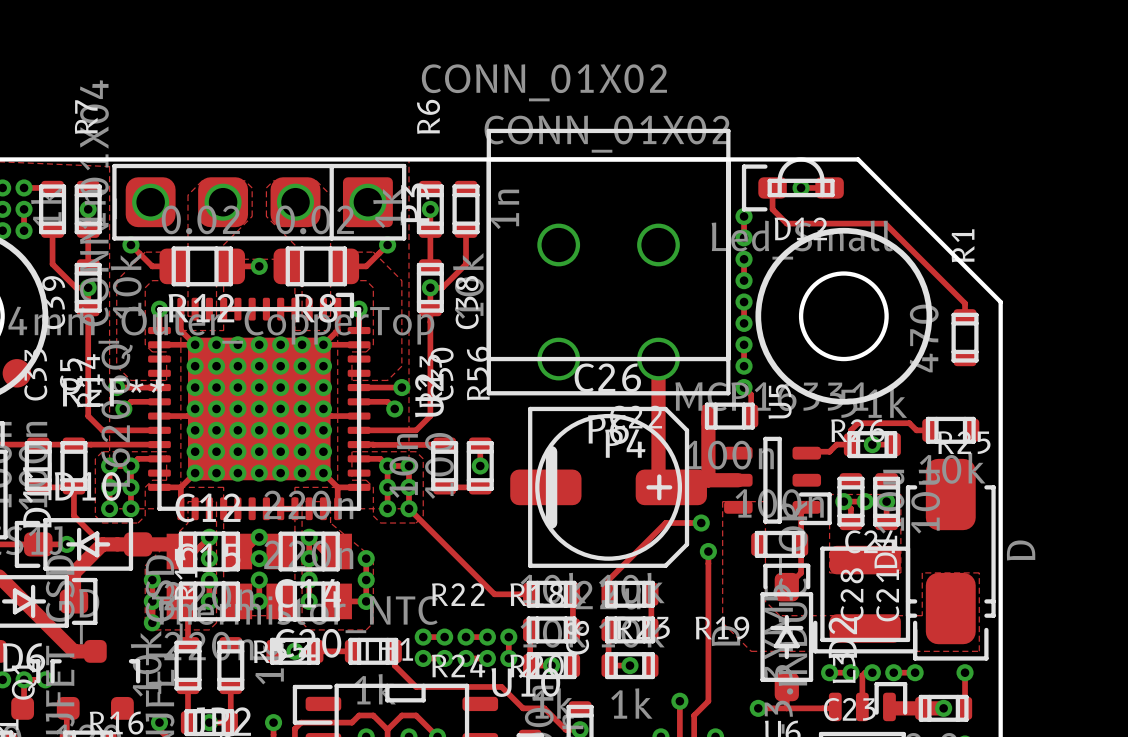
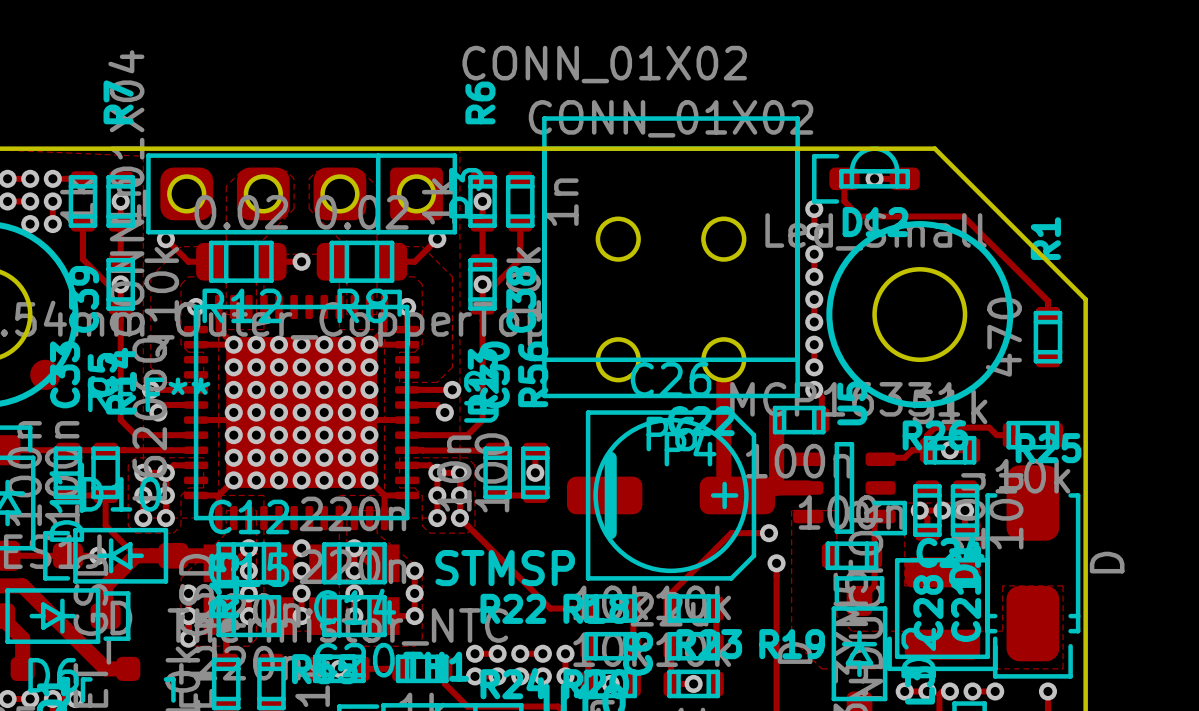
text: none -> STMSP (505, 568)

